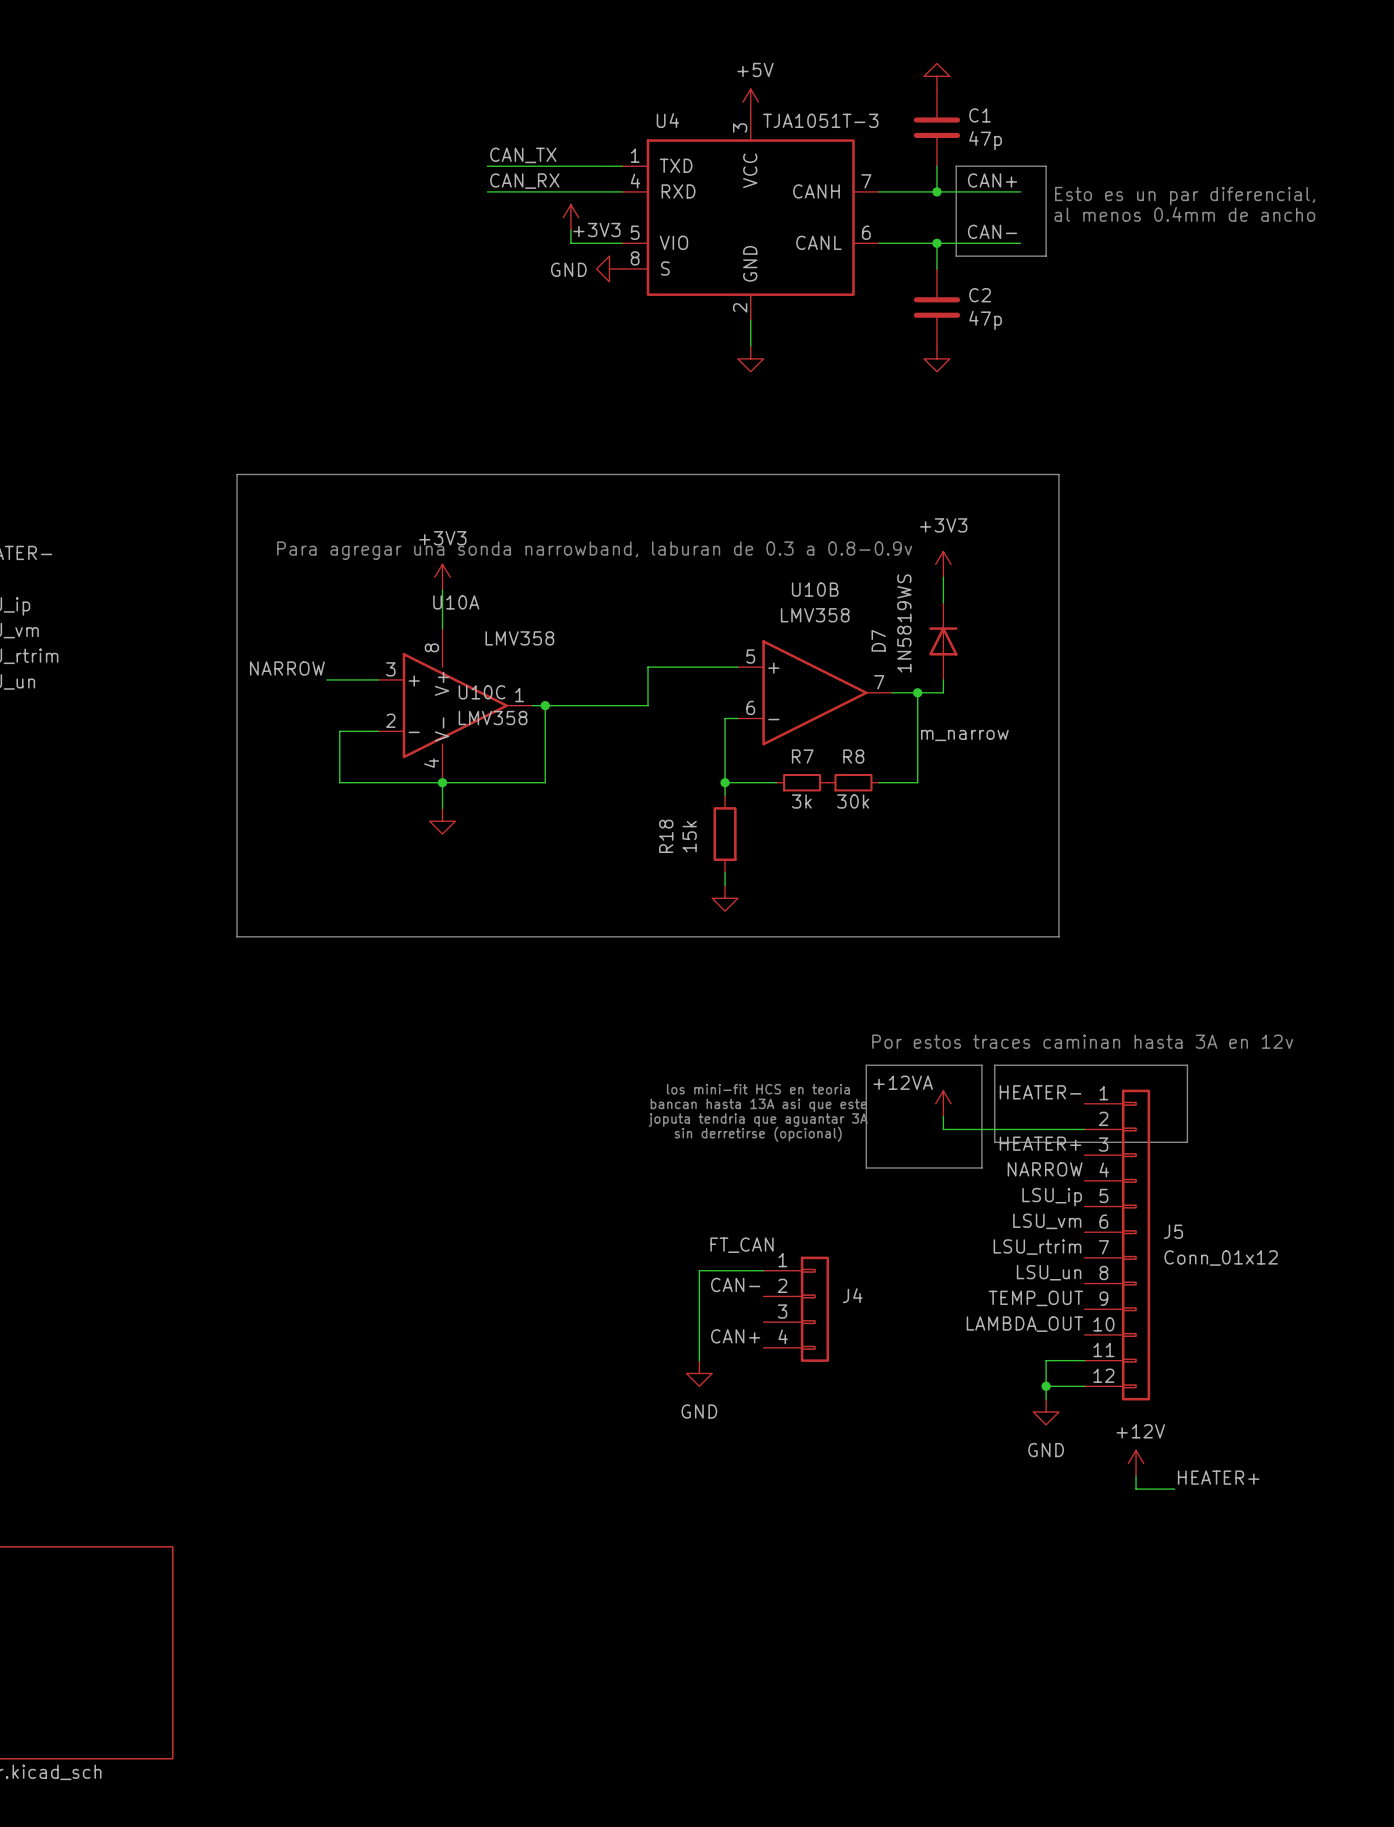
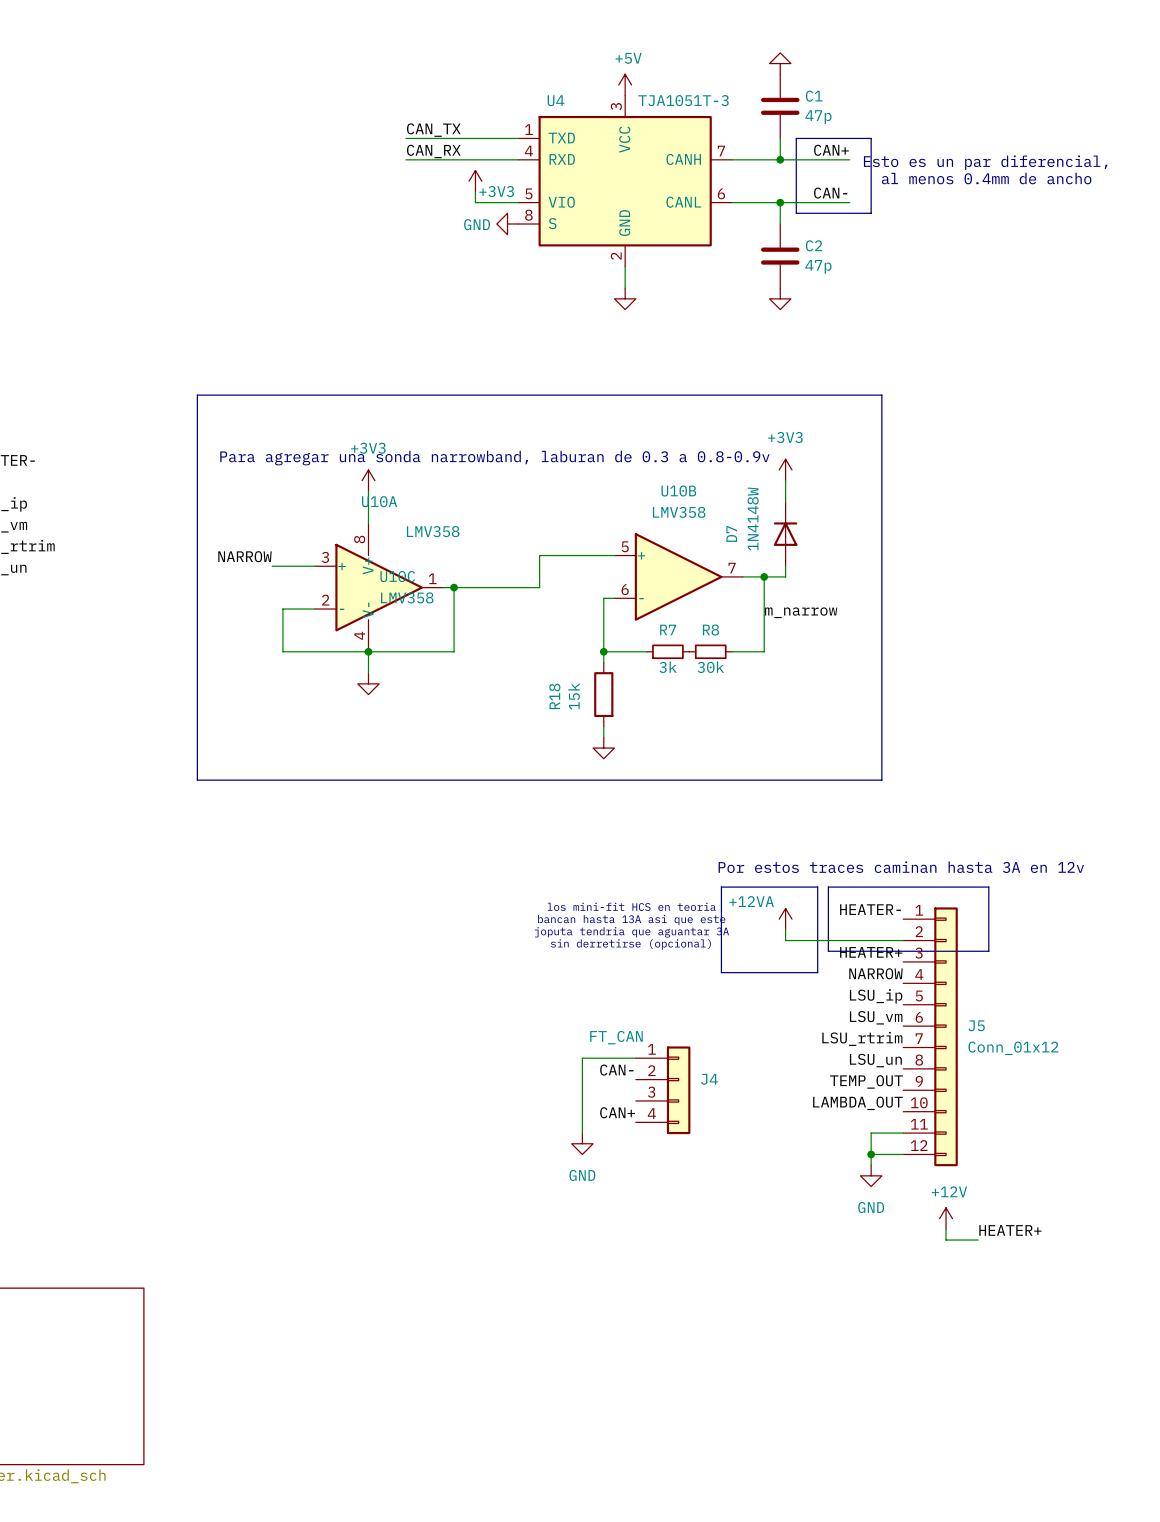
D7 value: 1N5819WS (904, 623) -> 1N4148W (753, 519)

